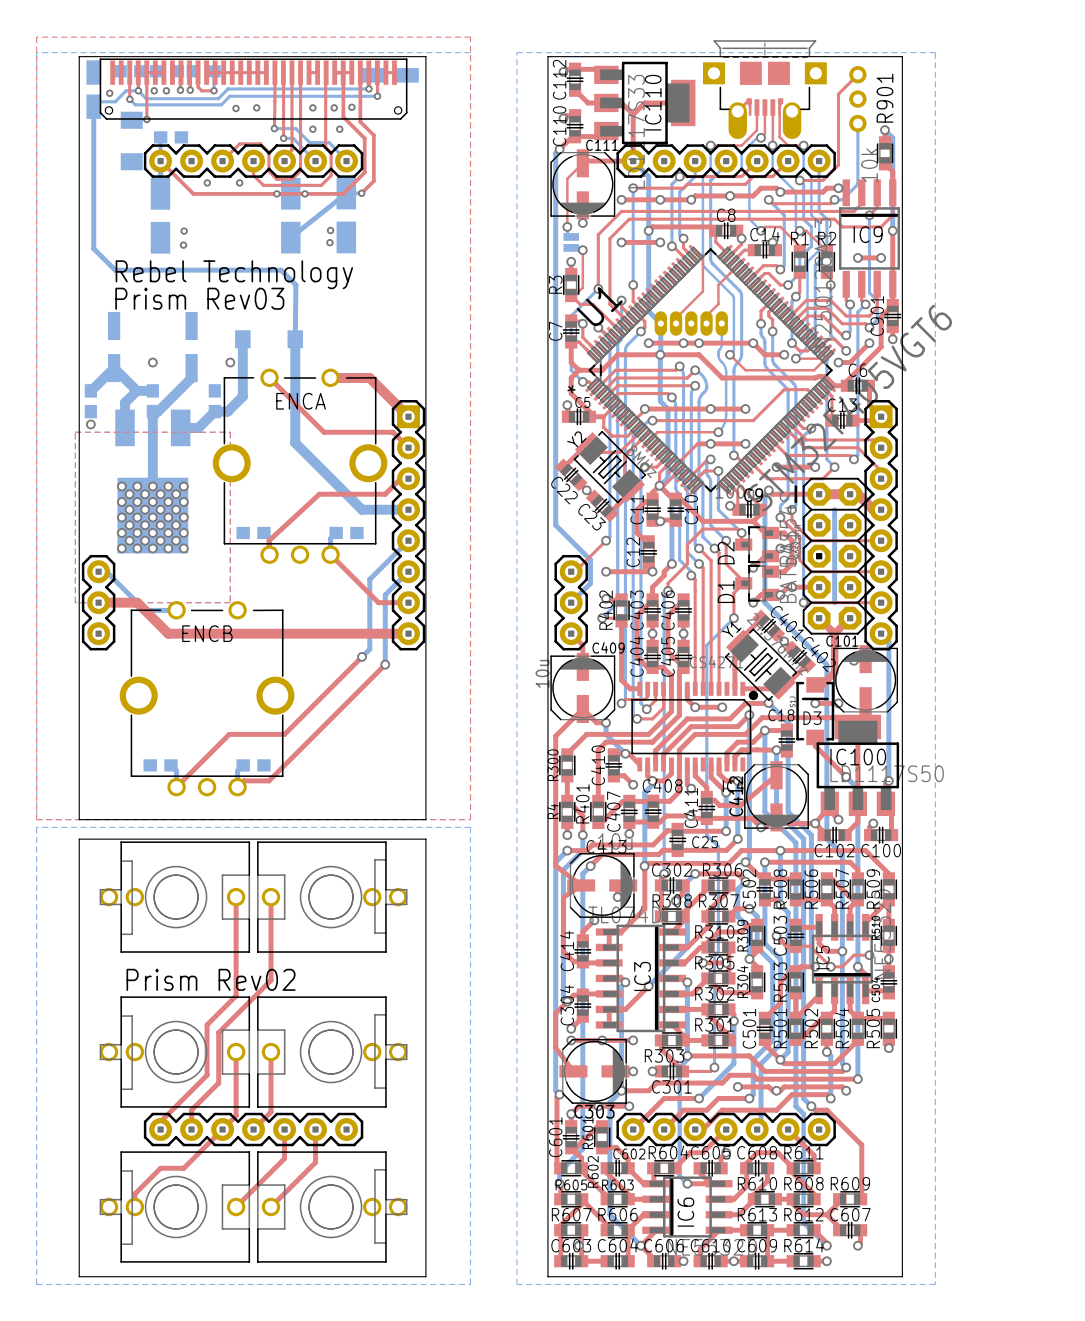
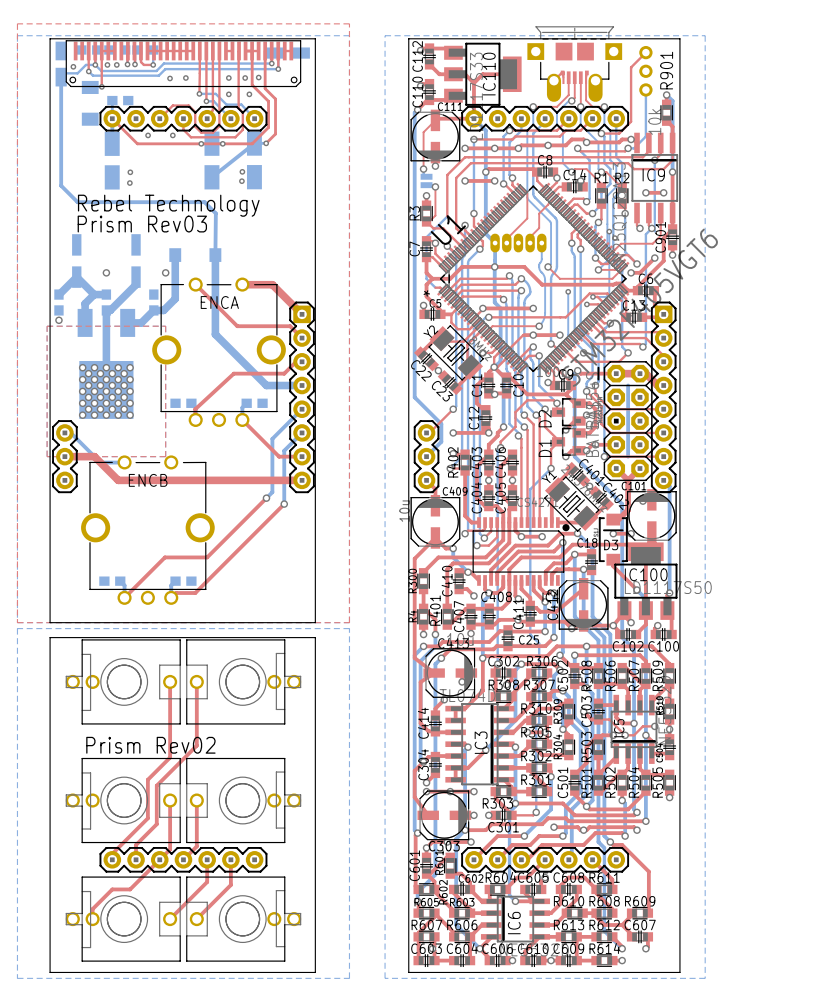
via: (598, 288) -> none
bottom track: (869, 292) (877, 300) (877, 319) (869, 327) -> (654, 219) (654, 231)
bottom track: (850, 304) (850, 331) (846, 335) -> none
bottom track: none -> (609, 231) (609, 293) (606, 296) (592, 296)
via: none -> (609, 231)
top track: (877, 308) (869, 316) (846, 316) (830, 300) (806, 300) (790, 316) -> (660, 231) (660, 235) (652, 243) (620, 243) (610, 254)
via: none -> (614, 238)
top track: (794, 320) (807, 308) (826, 308) (842, 323) (865, 323) (869, 327) -> none
top track: (798, 325) (807, 316) (823, 316) (842, 335) (846, 335) -> none
via: (869, 327) -> none
via: (846, 335) -> none
top track: (648, 343) (753, 343) (764, 354) (784, 354) -> none
via: (648, 343) -> none
via: (683, 343) -> none
via: (699, 343) -> none
via: (753, 343) -> none
via: (784, 354) -> none
bottom track: (772, 359) (774, 364) (795, 387) (795, 504) -> (580, 270) (580, 328) (598, 346) (598, 381)
bottom track: (764, 362) (766, 368) (788, 390) (788, 462) -> (574, 273) (574, 331) (592, 349)
via: (582, 381) -> none
bottom track: none -> (568, 291) (568, 335) (585, 352)
via: none -> (568, 291)
top track: none -> (592, 296) (597, 296) (607, 306)
via: none -> (592, 296)
top track: none -> (586, 304) (598, 304) (604, 309)
via: none -> (586, 304)
top track: (710, 409) (745, 409) -> none
via: (745, 409) -> none
top track: (776, 467) (815, 467) -> none
via: (815, 467) -> none

